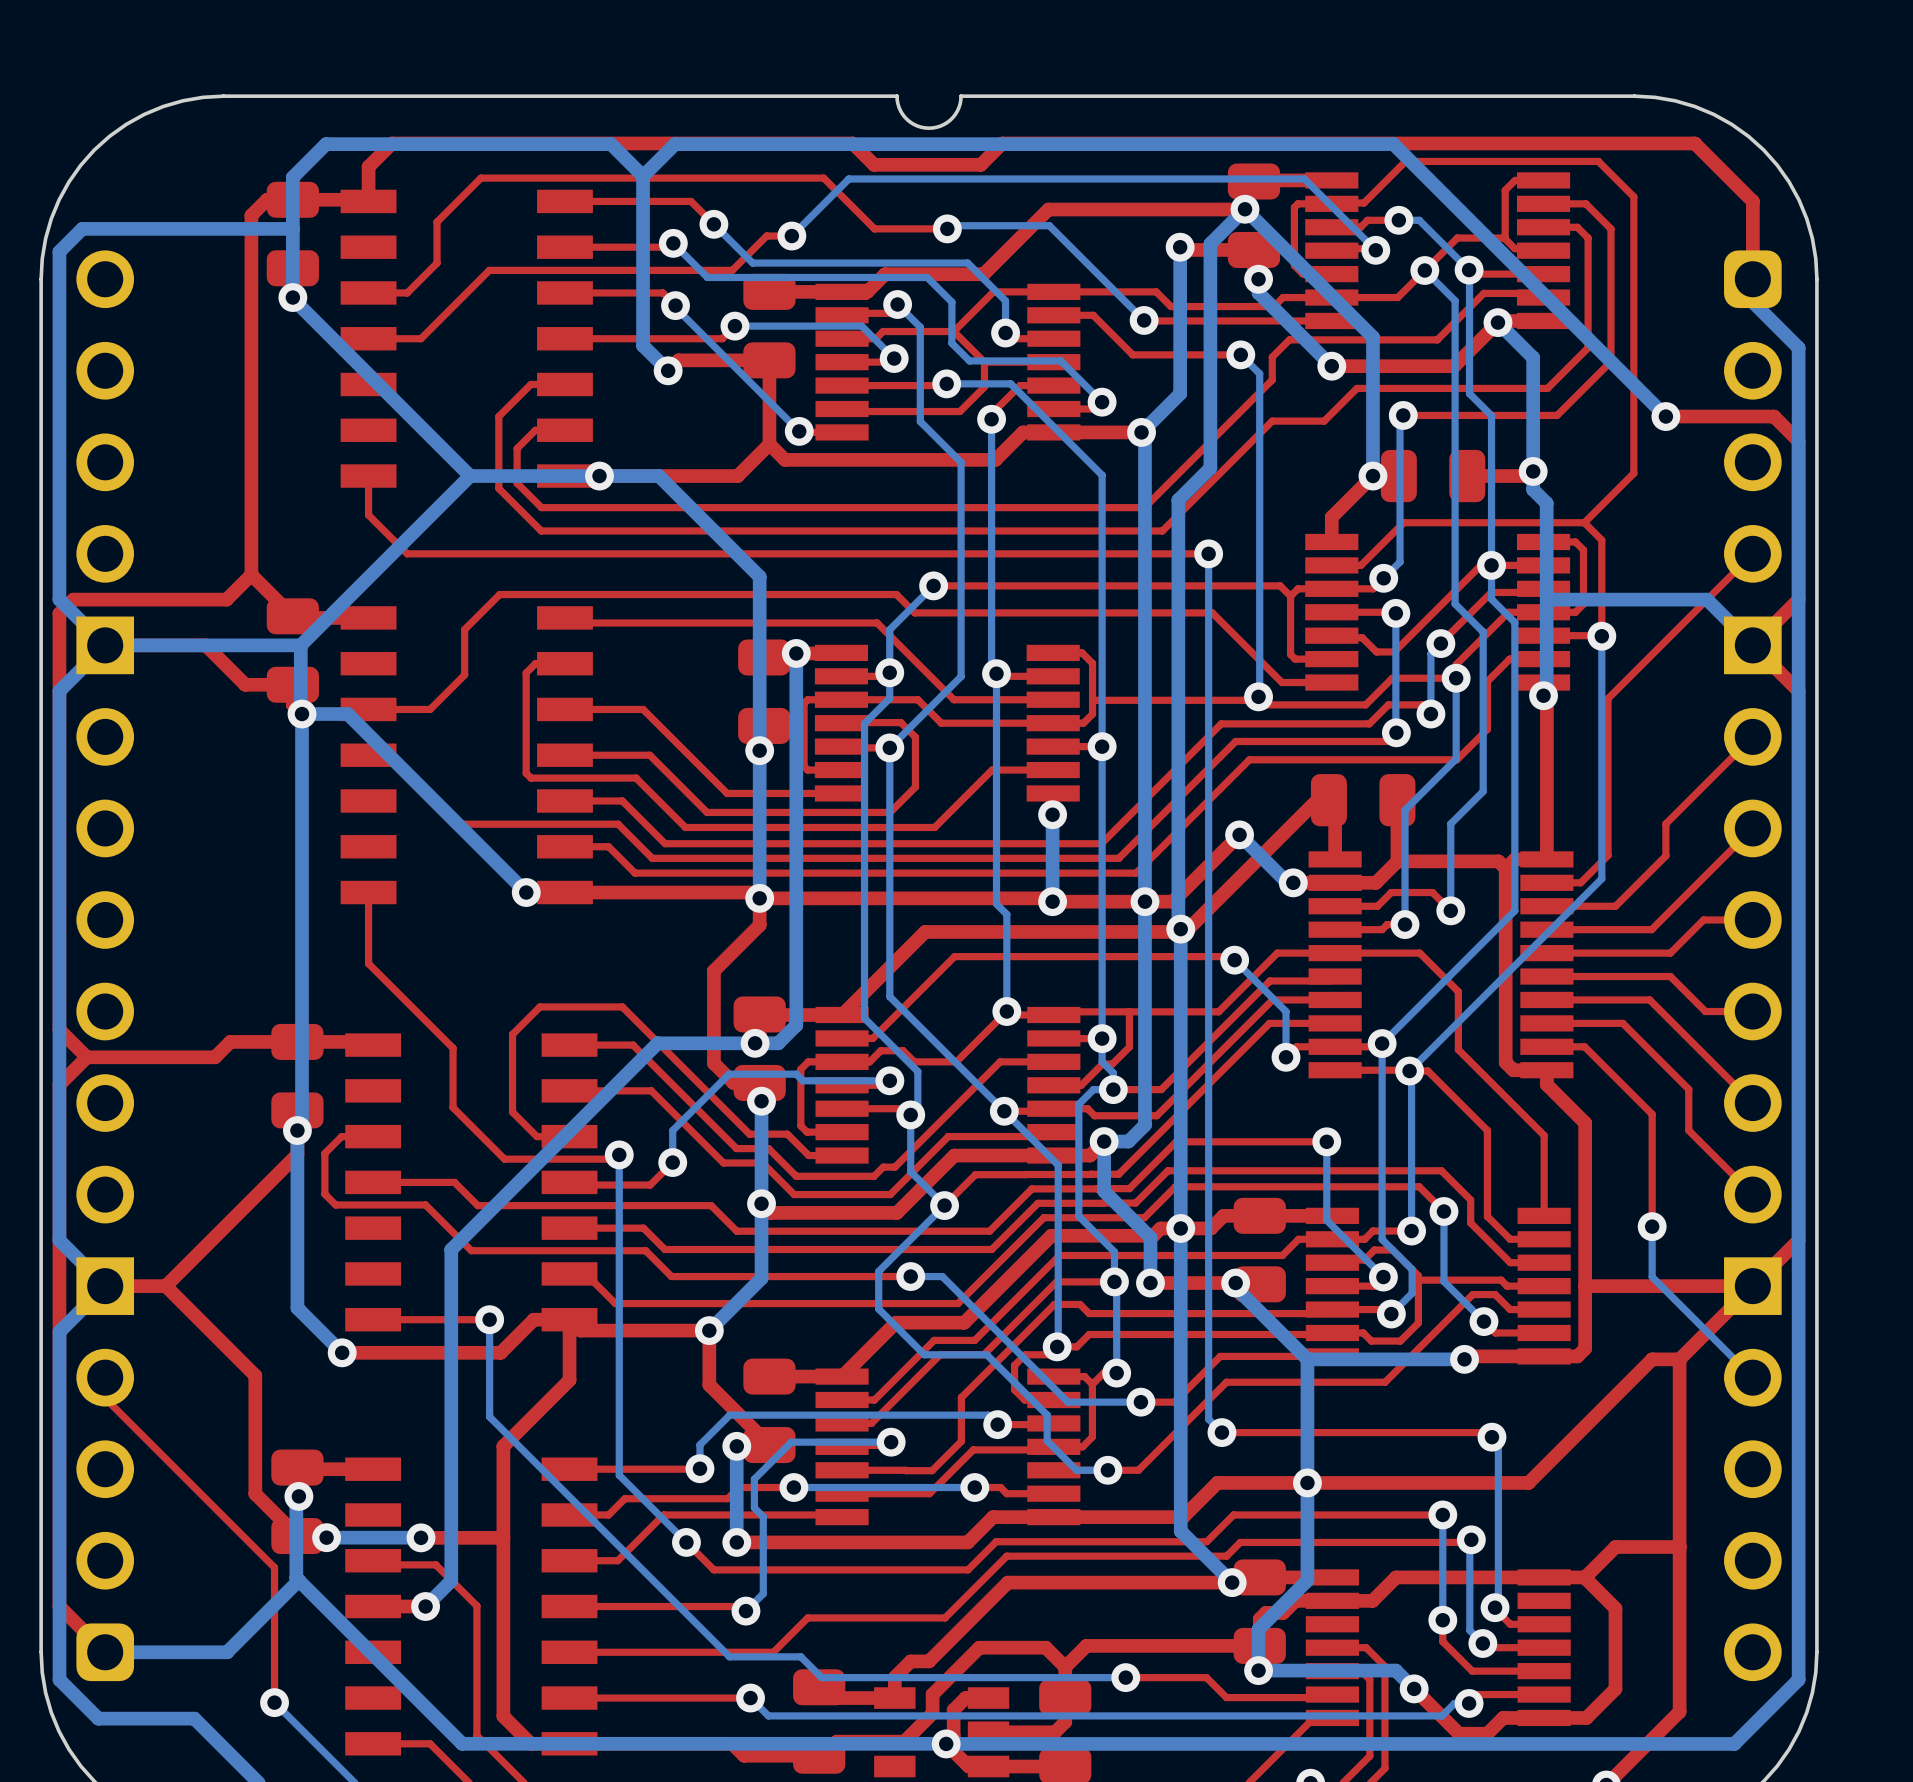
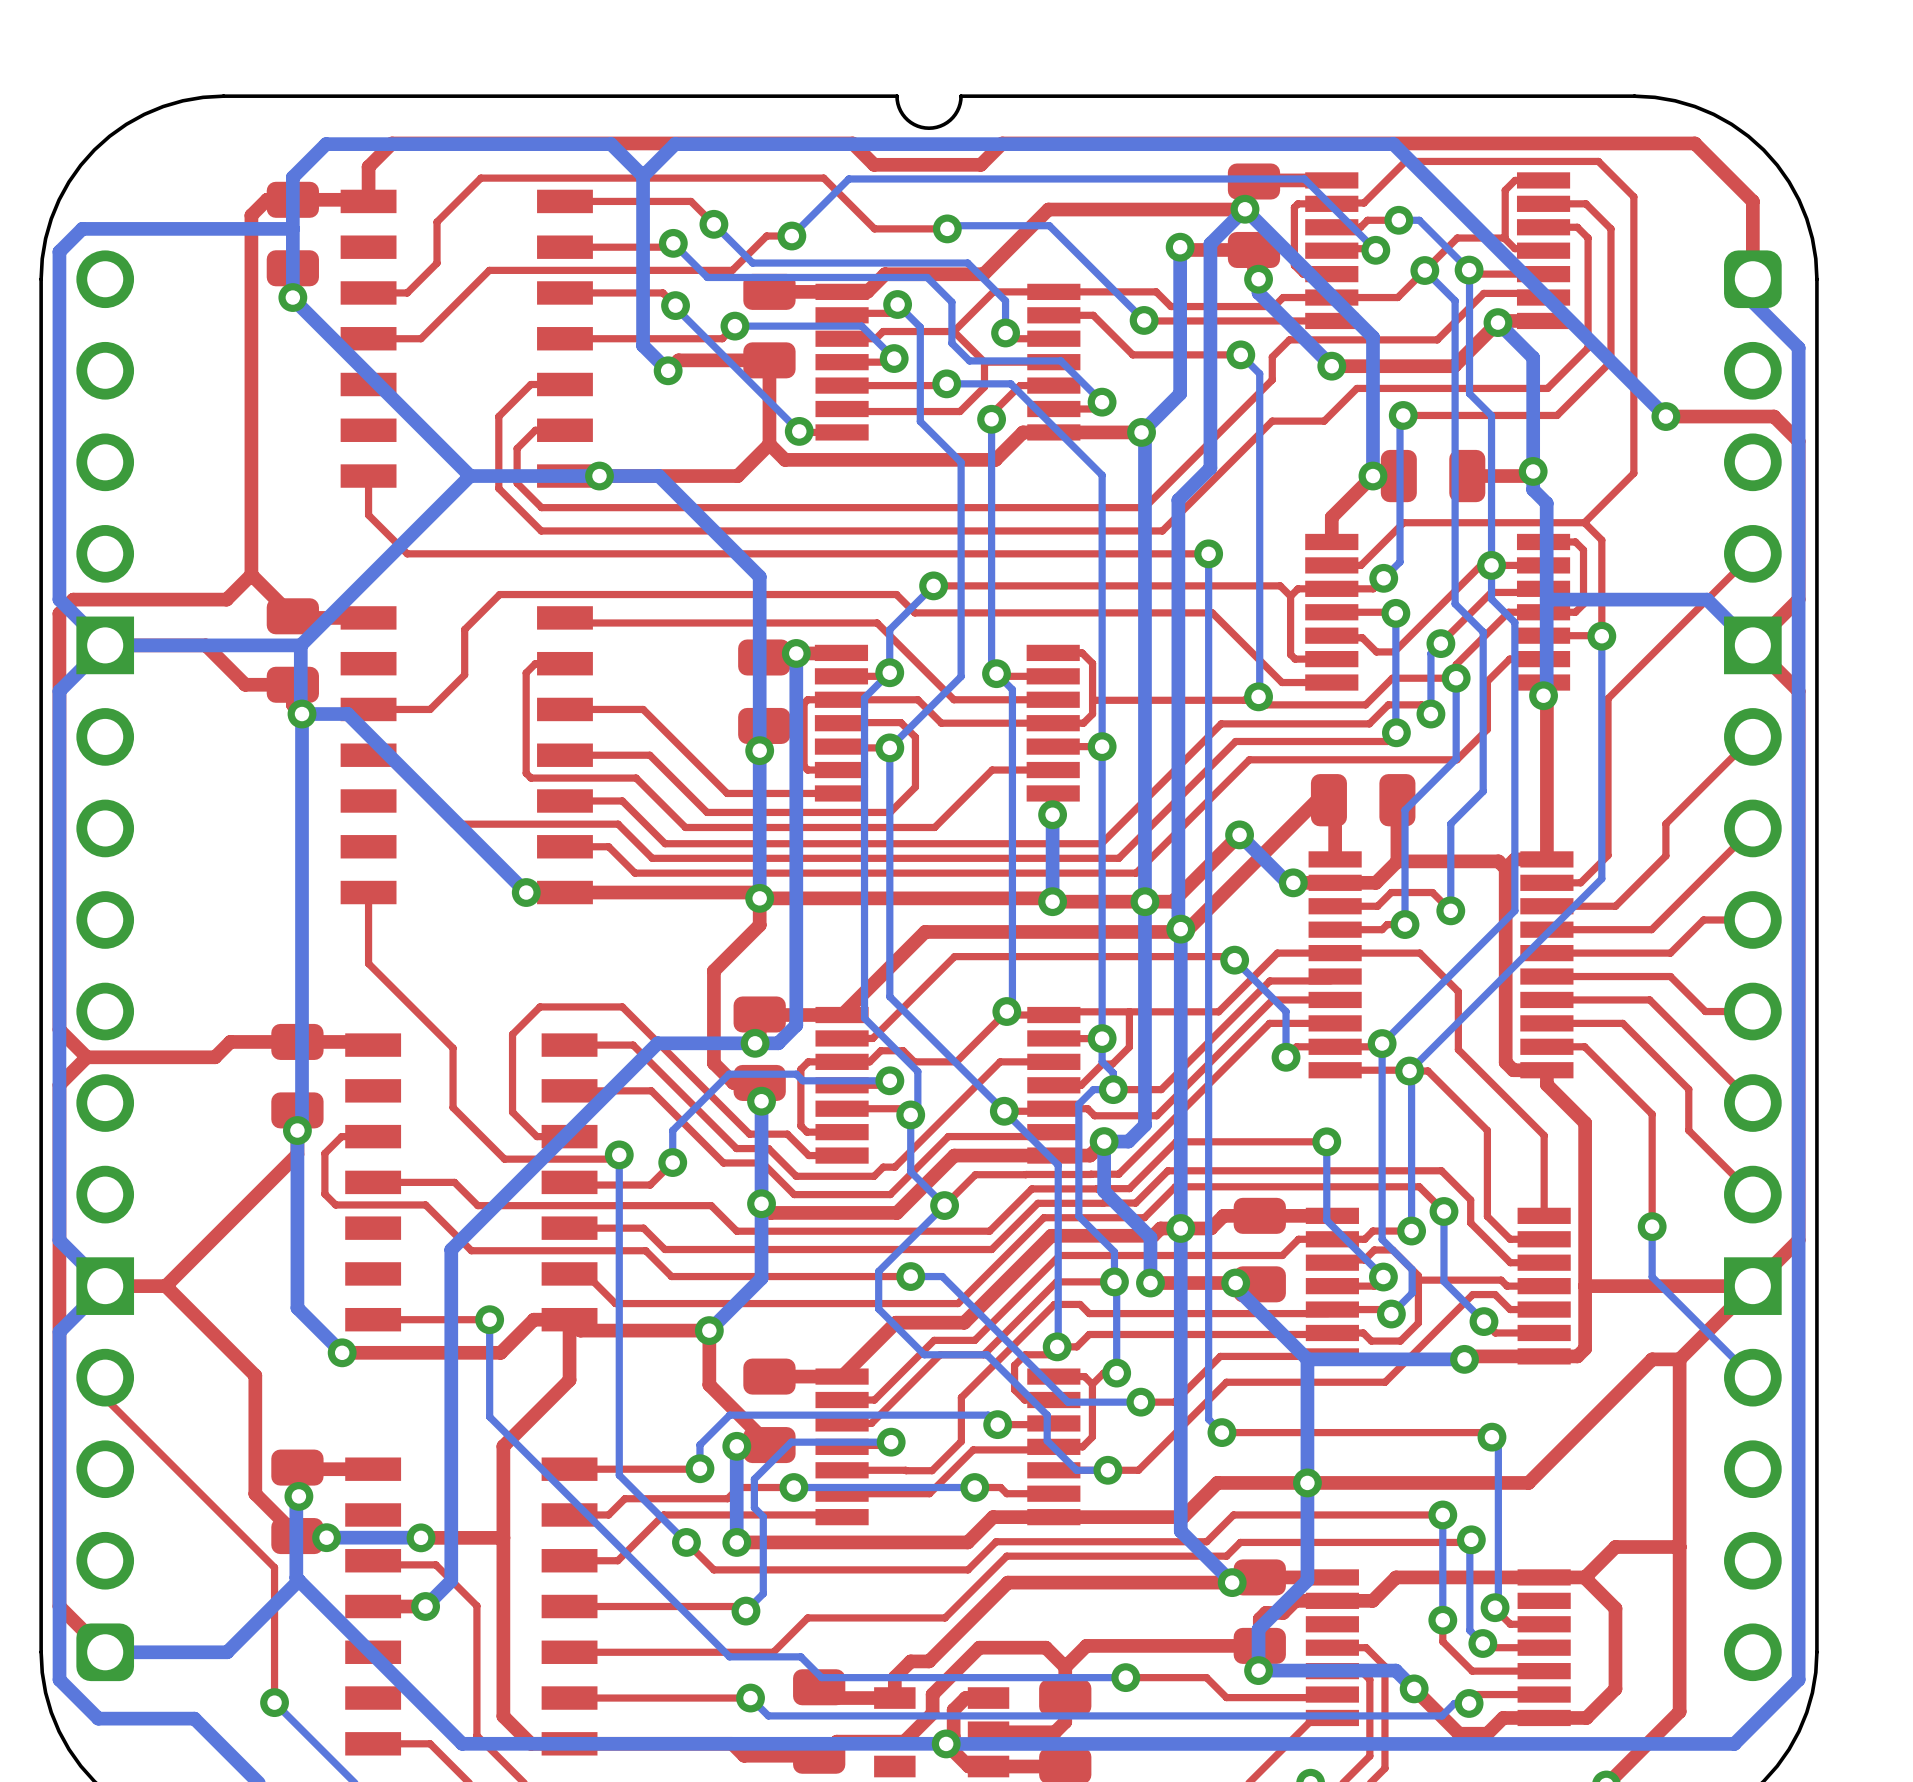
bottom track: (889, 672) (889, 698) (864, 723) -> (889, 672) (864, 697) (864, 723)
bottom track: (996, 673) (996, 904) (1006, 914) (1006, 1011) -> (996, 673) (1012, 689) (1012, 1005) (1006, 1011)

